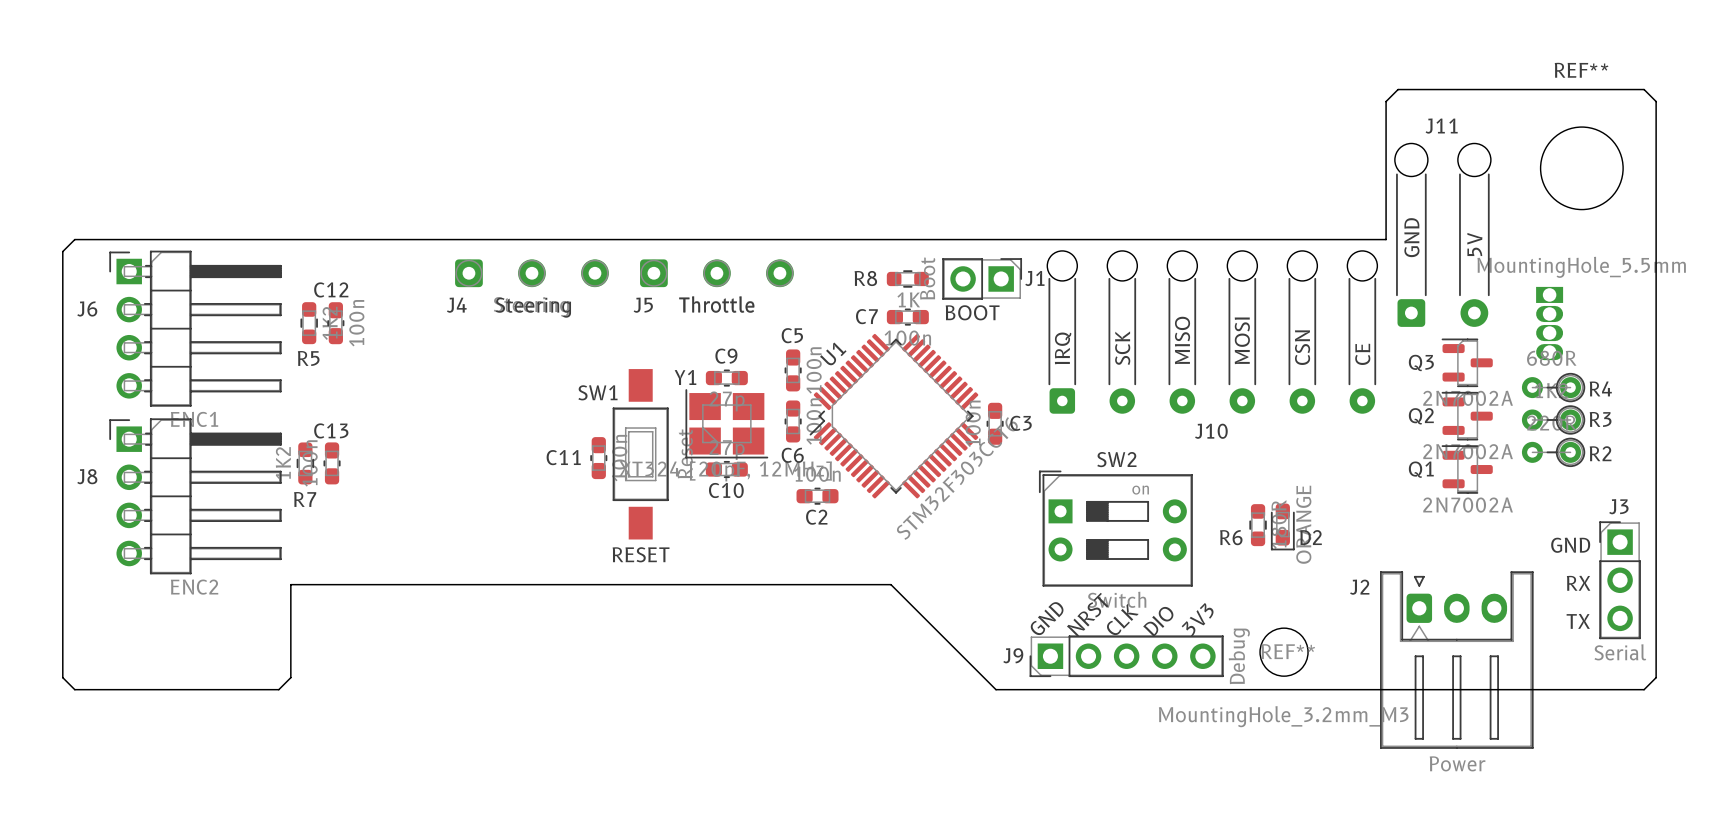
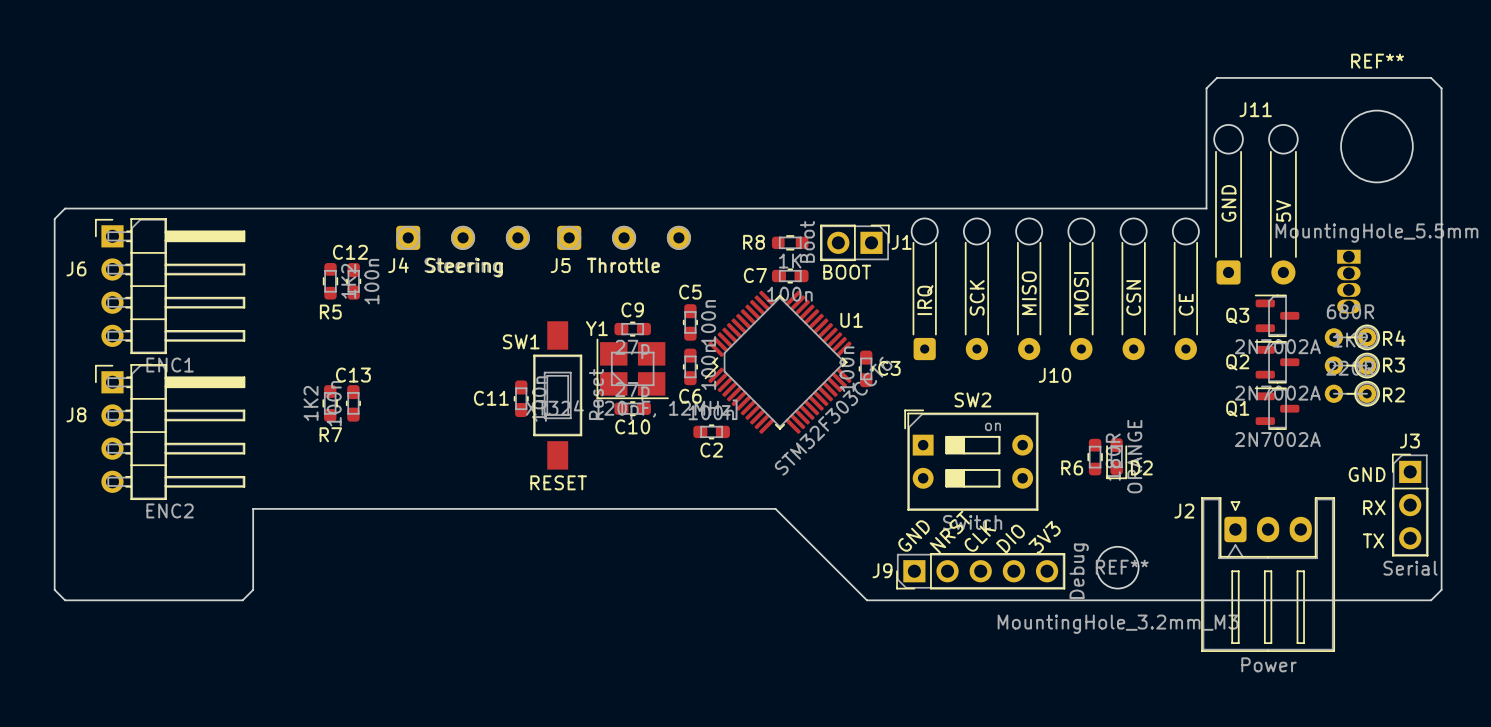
R5 position: (309, 323) -> (330, 281)
C12 position: (335, 323) -> (353, 281)
U1 name rotation: 0° (833, 353) -> 45° clockwise (851, 320)
U1 name position: U1 (833, 353) -> U1 (851, 320)
R7 position: (305, 463) -> (330, 403)
C13 position: (332, 463) -> (353, 403)

